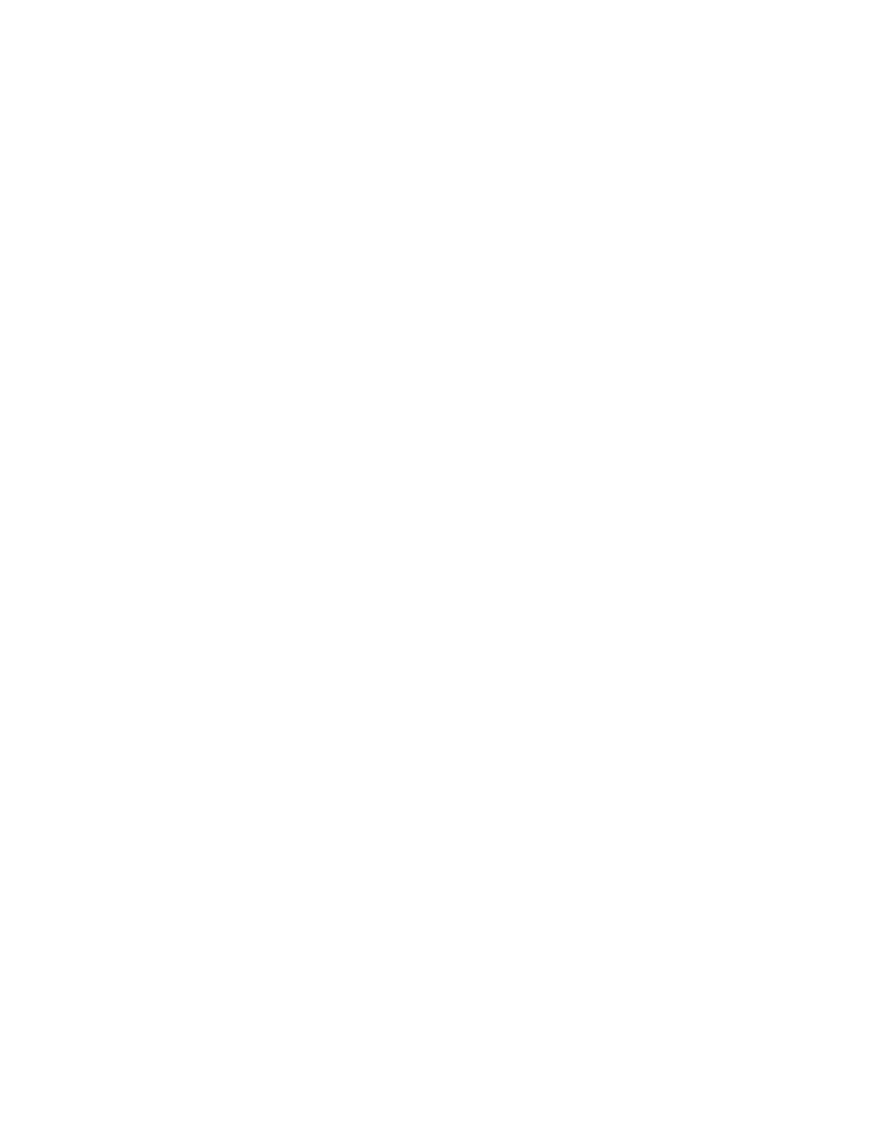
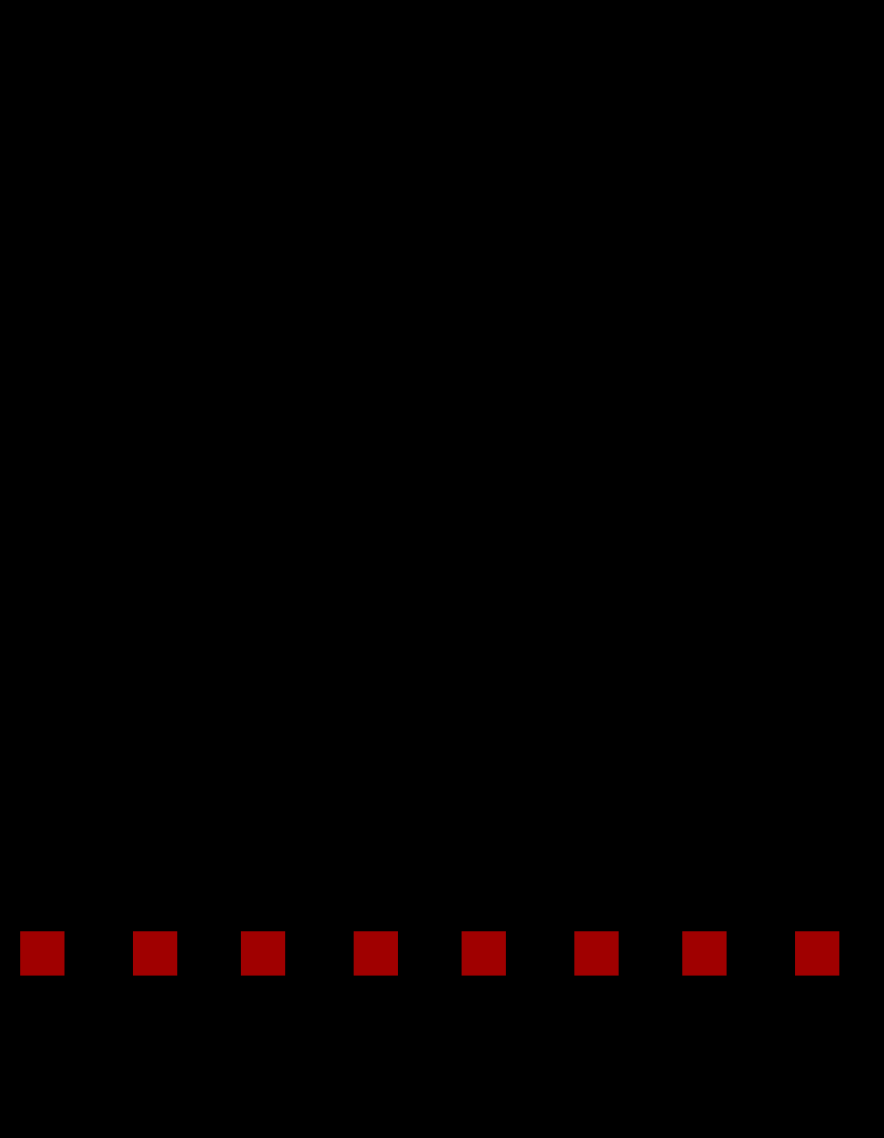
part: none -> (98, 953)
part: none -> (319, 953)
part: none -> (540, 953)
part: none -> (760, 953)

